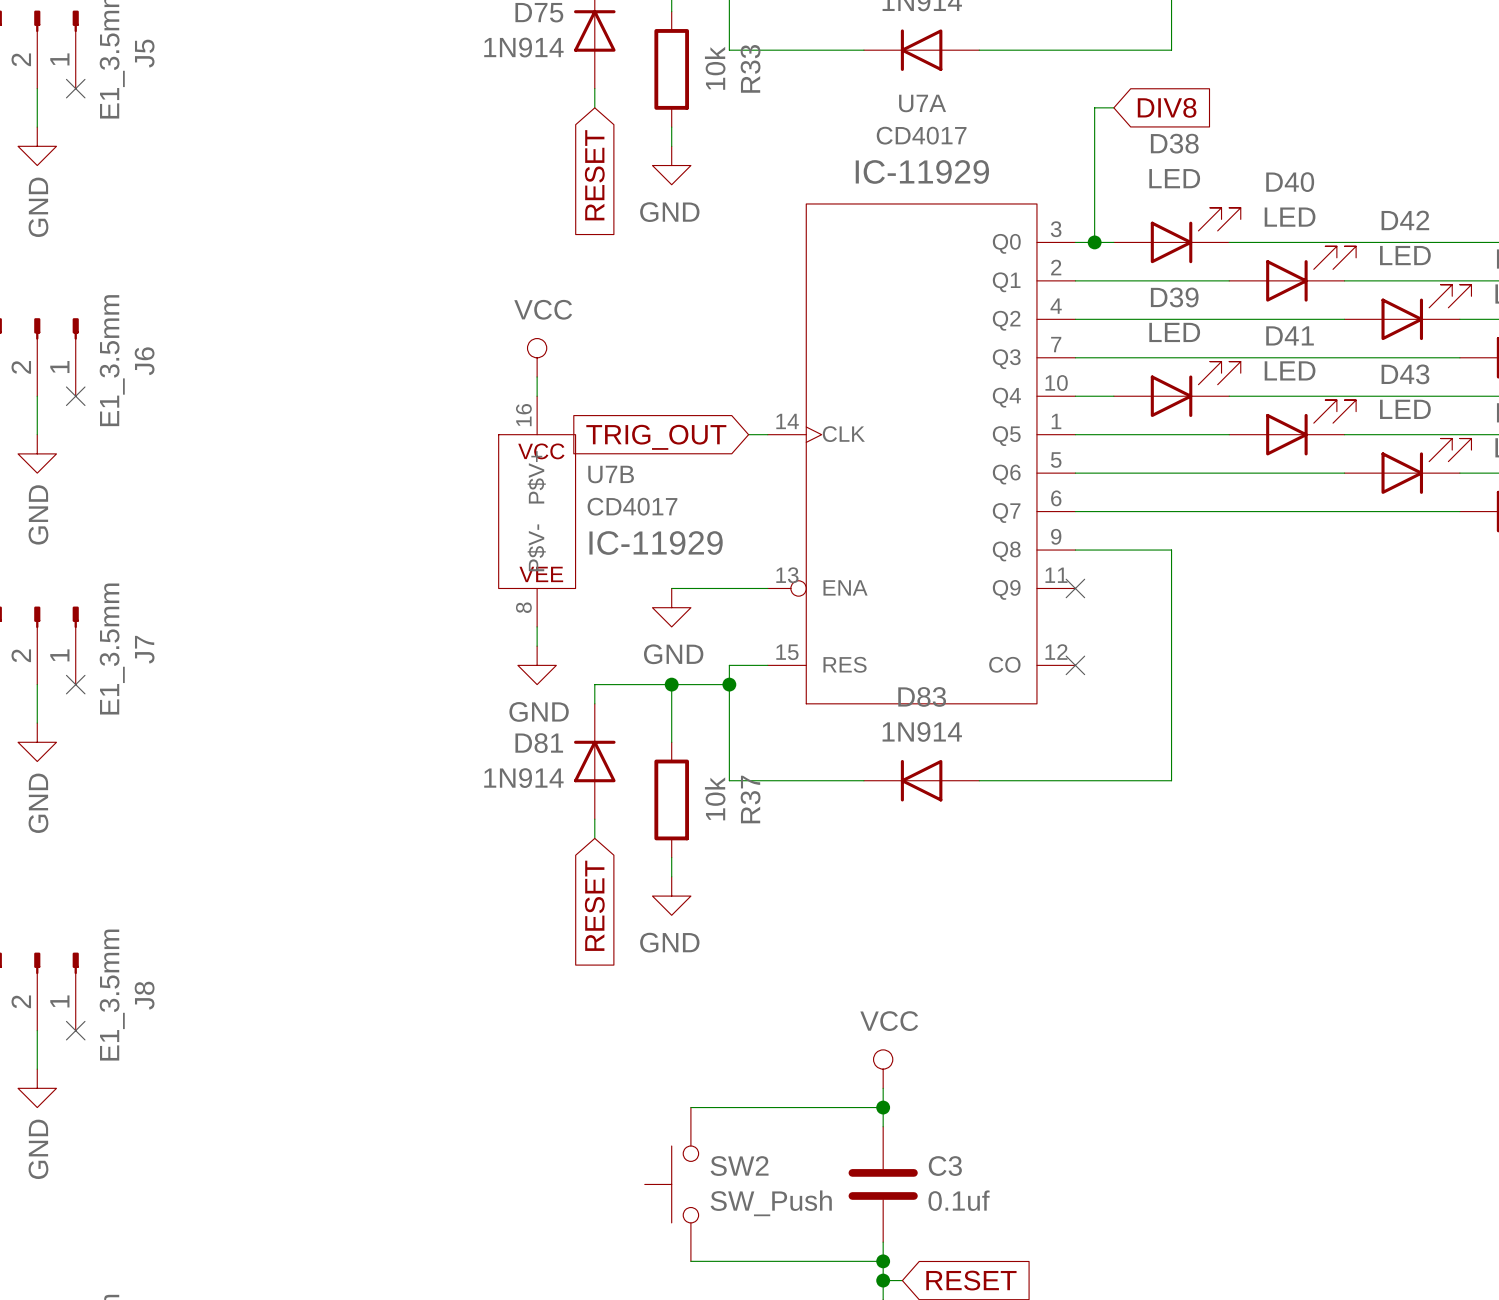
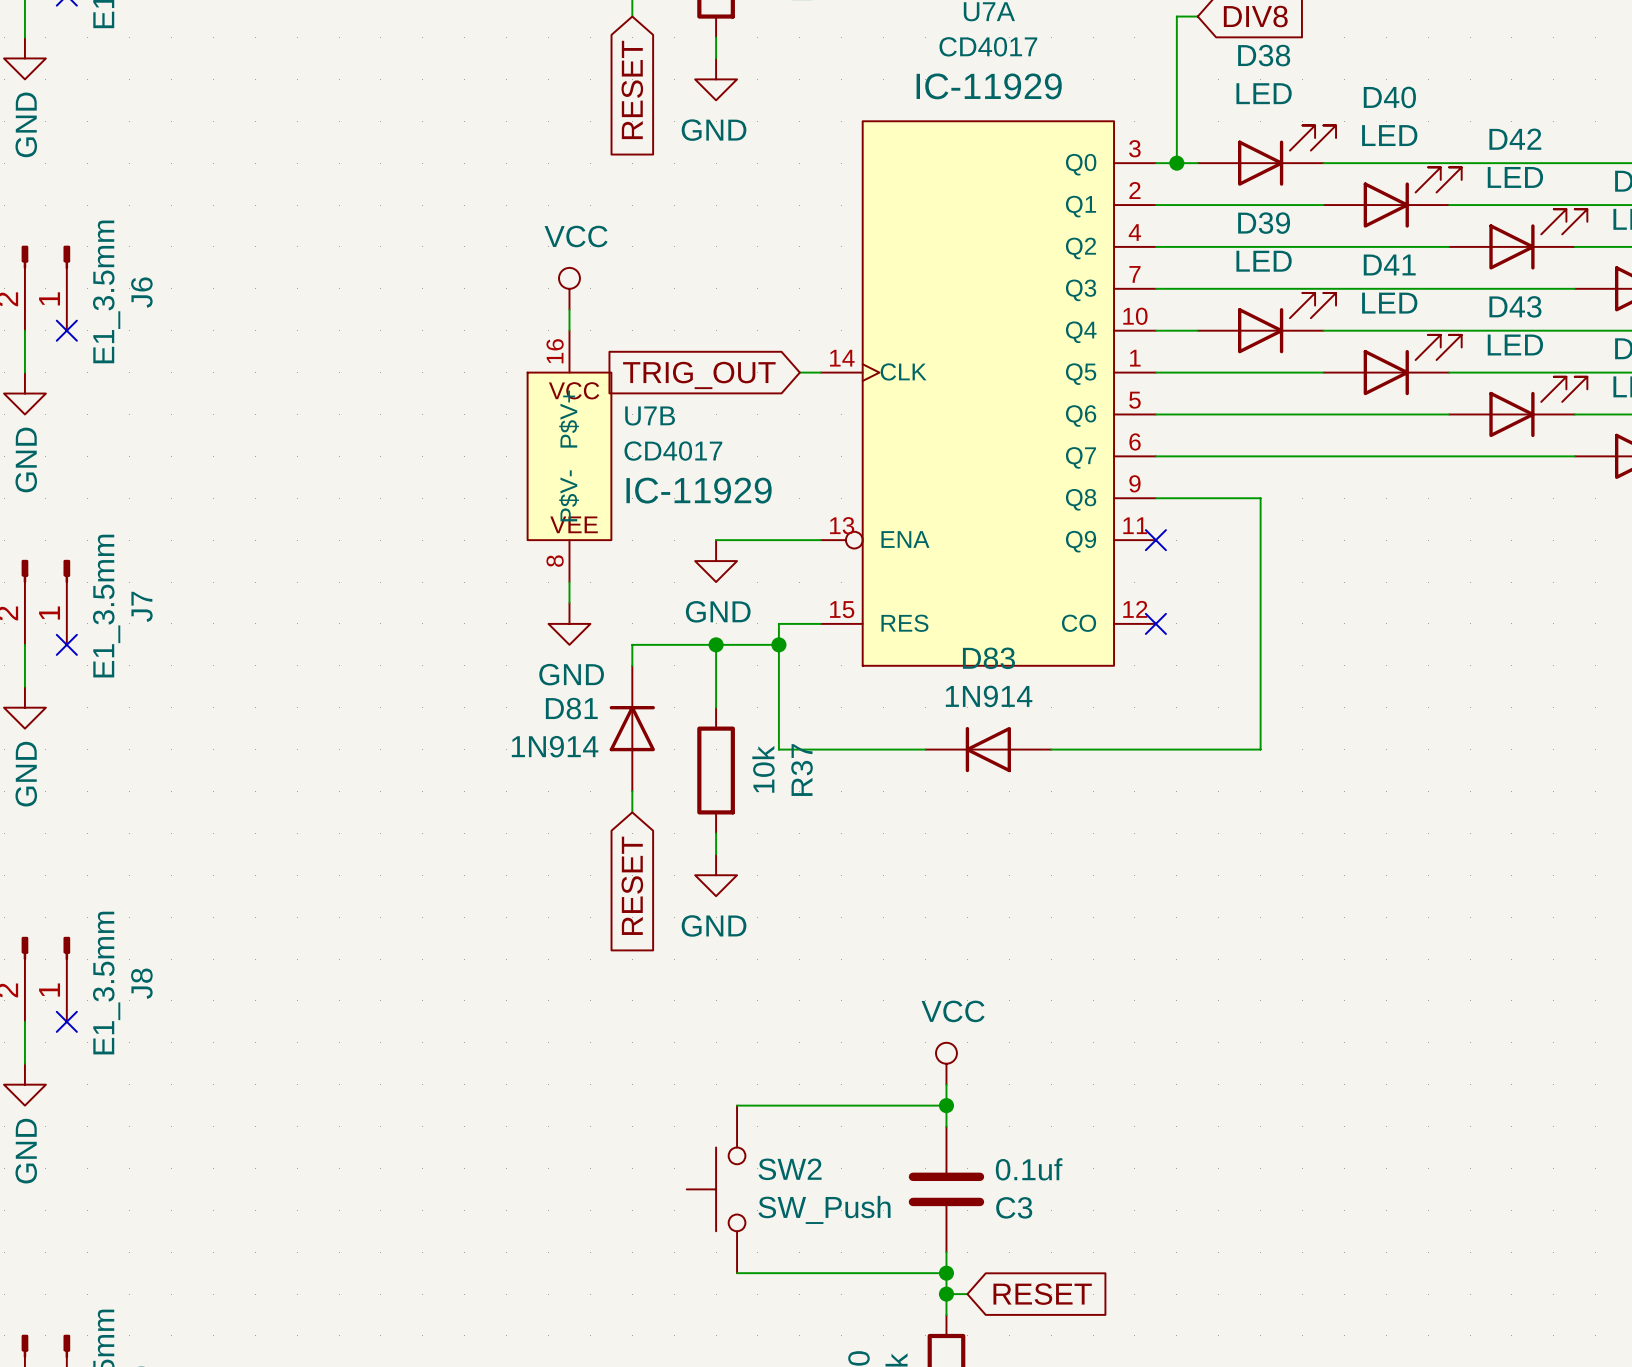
C3 name position: C3 (945, 1166) -> C3 (1014, 1207)
C3 value position: 0.1uf (959, 1200) -> 0.1uf (1029, 1169)

